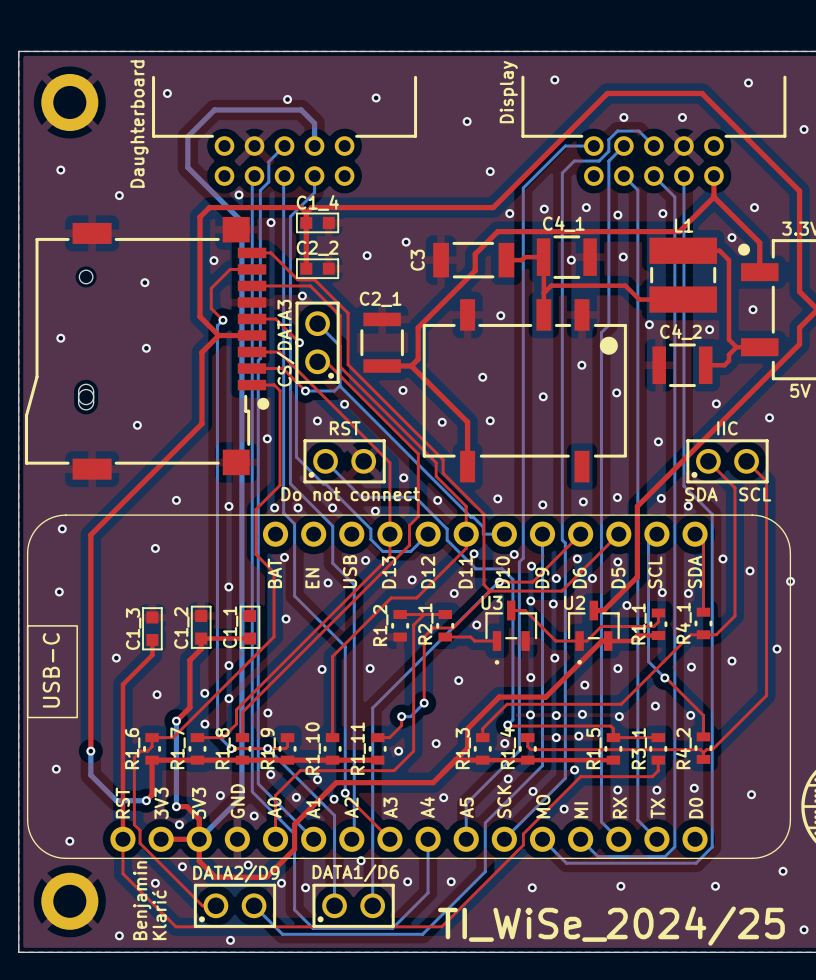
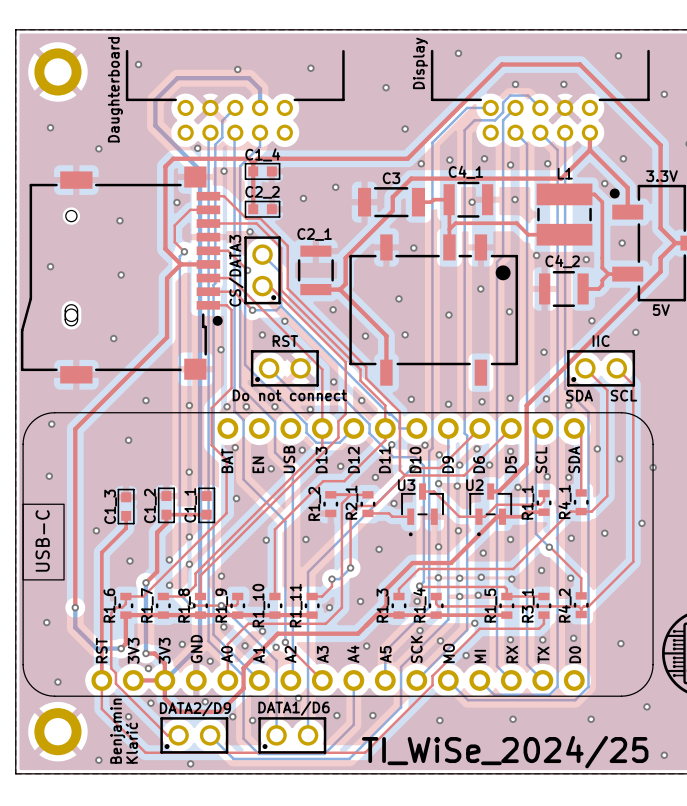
C3 name rotation: 0° (417, 260) -> 90° clockwise (391, 178)
C3 name position: C3 (417, 260) -> C3 (391, 178)

